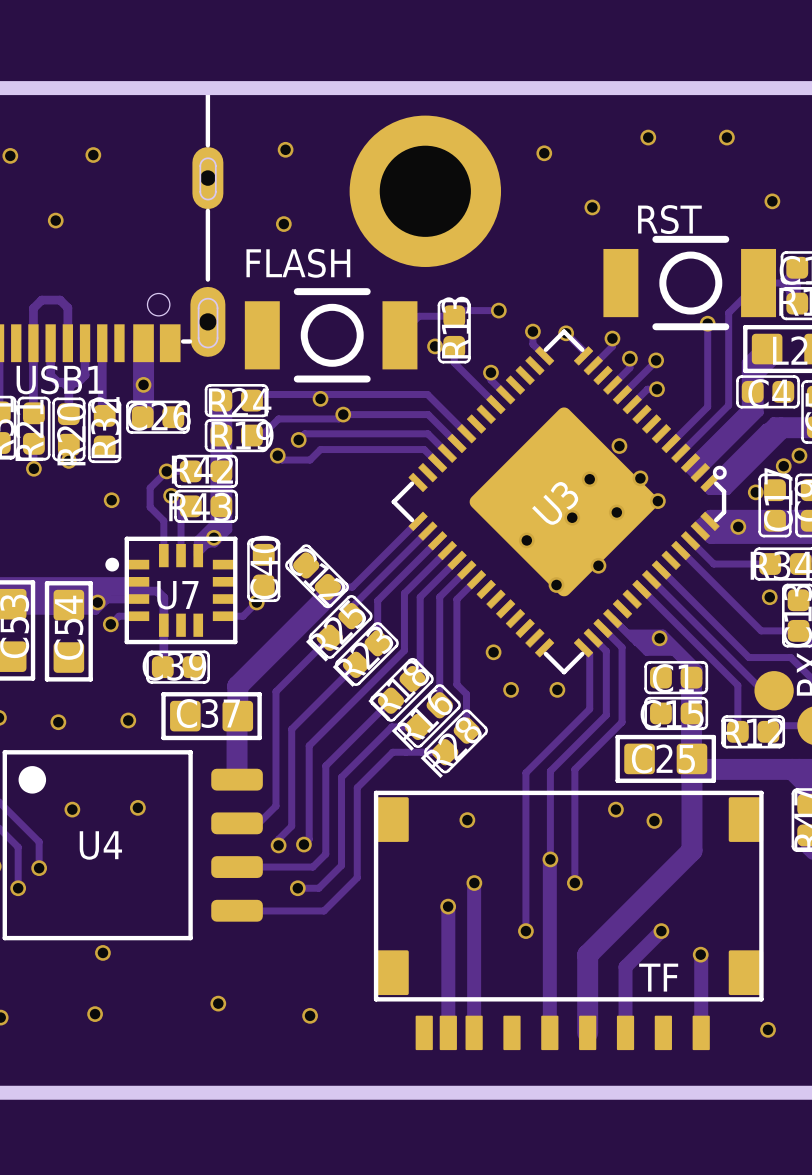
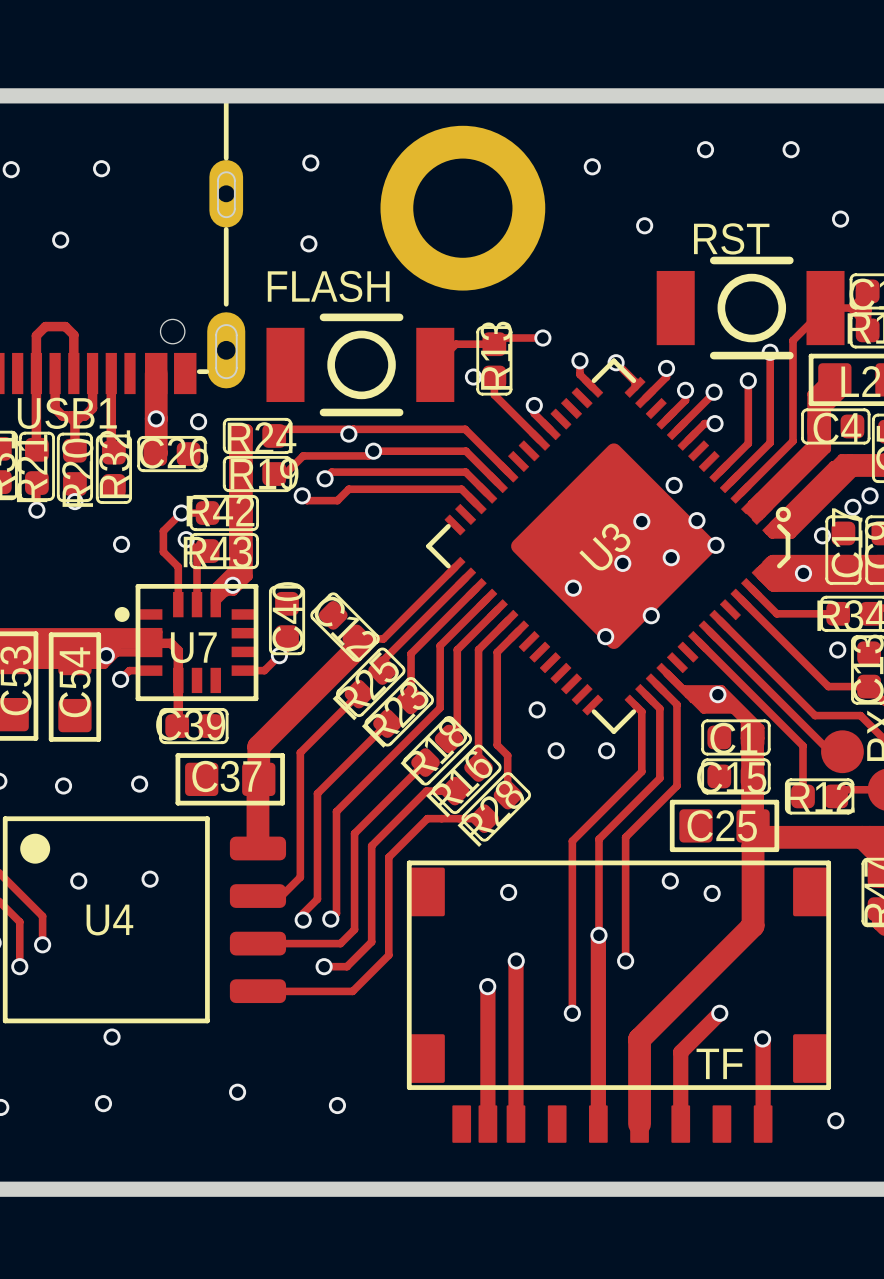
track: none -> (748, 380) (748, 443) (719, 472)
via: none -> (748, 380)
via: none -> (198, 421)

